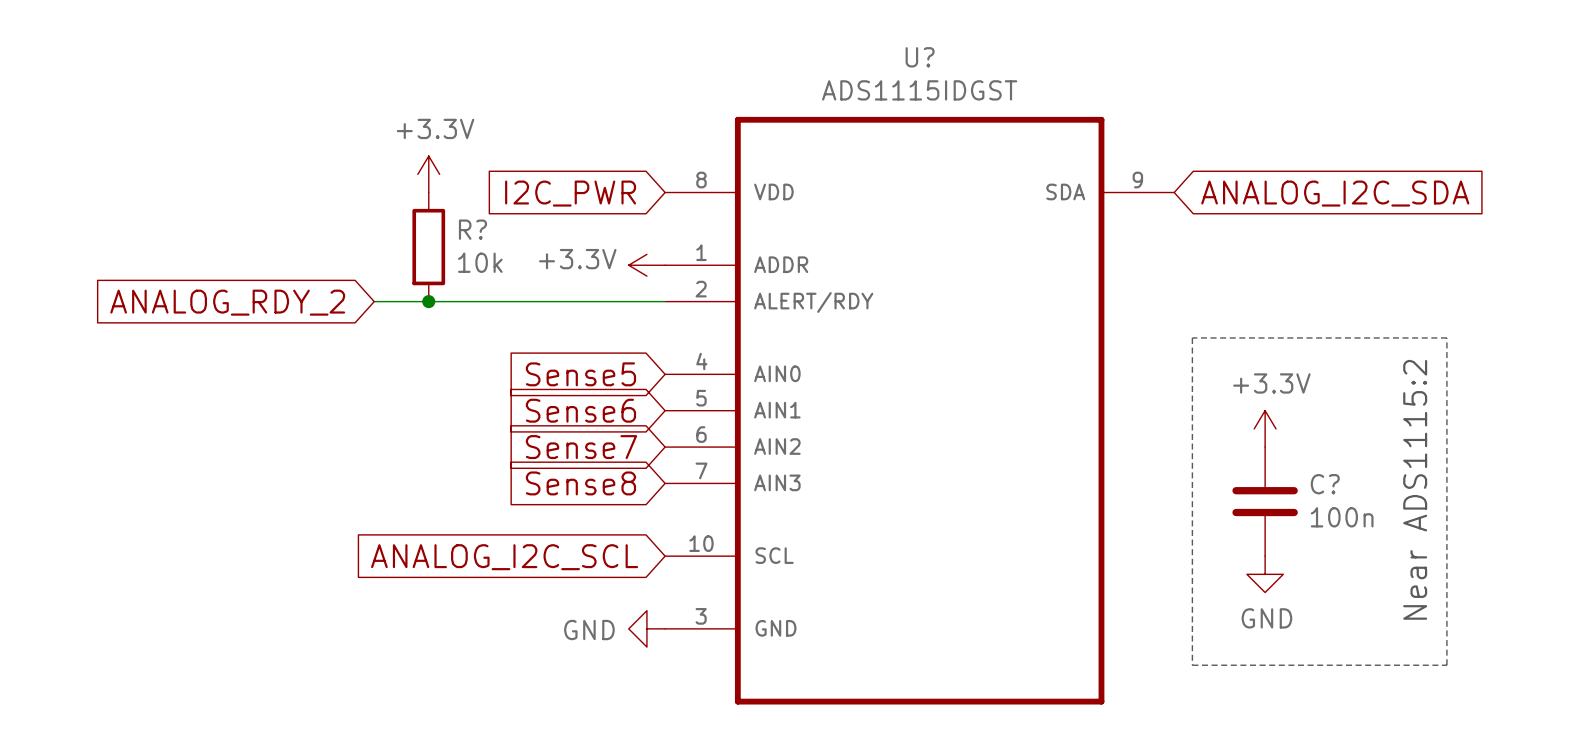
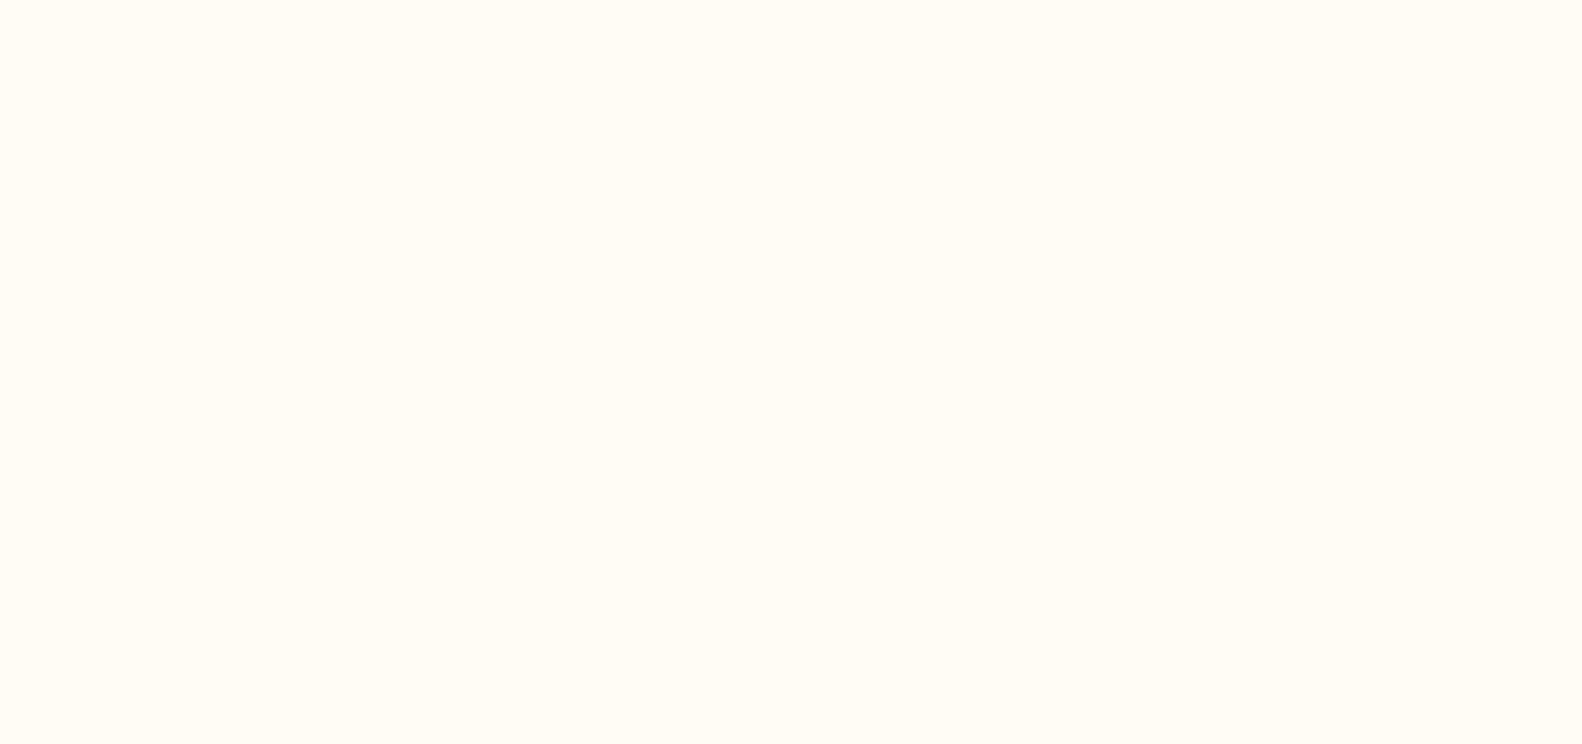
power symbol: +3.3V (428, 174) -> none
global label: I2C_PWR (570, 193) -> none
global label: ANALOG_I2C_SDA (1335, 193) -> none
R?: 10k (428, 247) -> none
power symbol: +3.3V (646, 265) -> none
wire: (374, 301) (665, 301) -> none
junction: (428, 301) -> none
global label: ANALOG_RDY_2 (227, 302) -> none
line: (1192, 337) (1446, 337) (1446, 665) (1192, 665) (1192, 337) -> none
global label: Sense5 (580, 374) -> none
global label: Sense6 (580, 410) -> none
U?: ADS1115IDGST (919, 410) -> none
power symbol: +3.3V (1265, 428) -> none
global label: Sense7 (581, 447) -> none
global label: Sense8 (580, 483) -> none
text: Near ADS1115:2 (1415, 489) -> none
C?: 100n (1265, 501) -> none
global label: ANALOG_I2C_SCL (504, 557) -> none
power symbol: GND (1265, 574) -> none
power symbol: GND (646, 628) -> none

